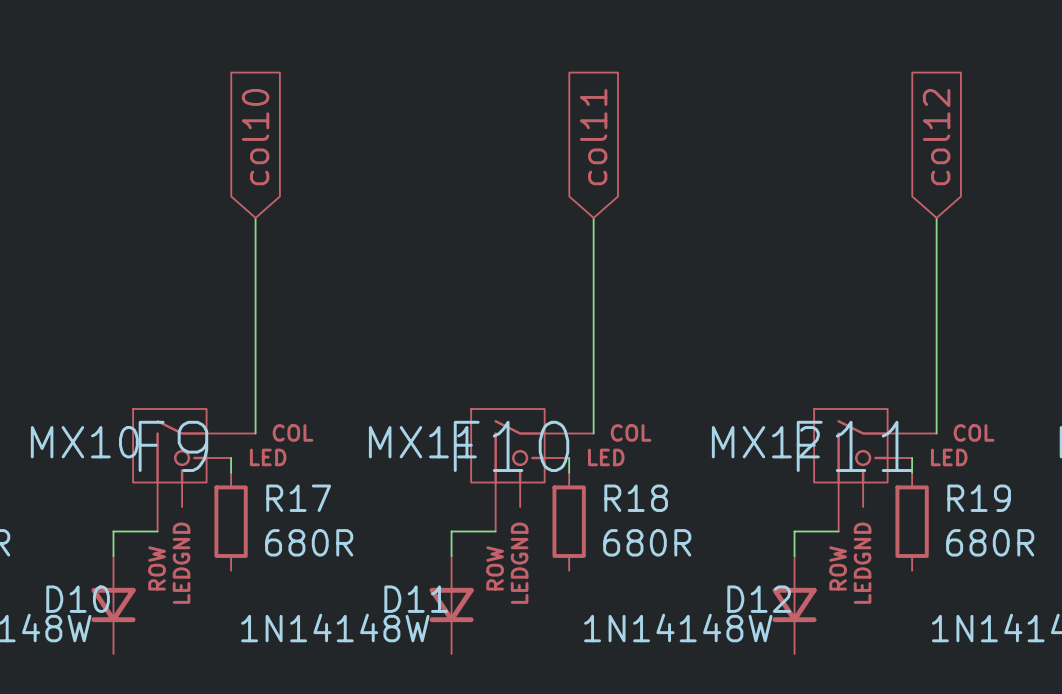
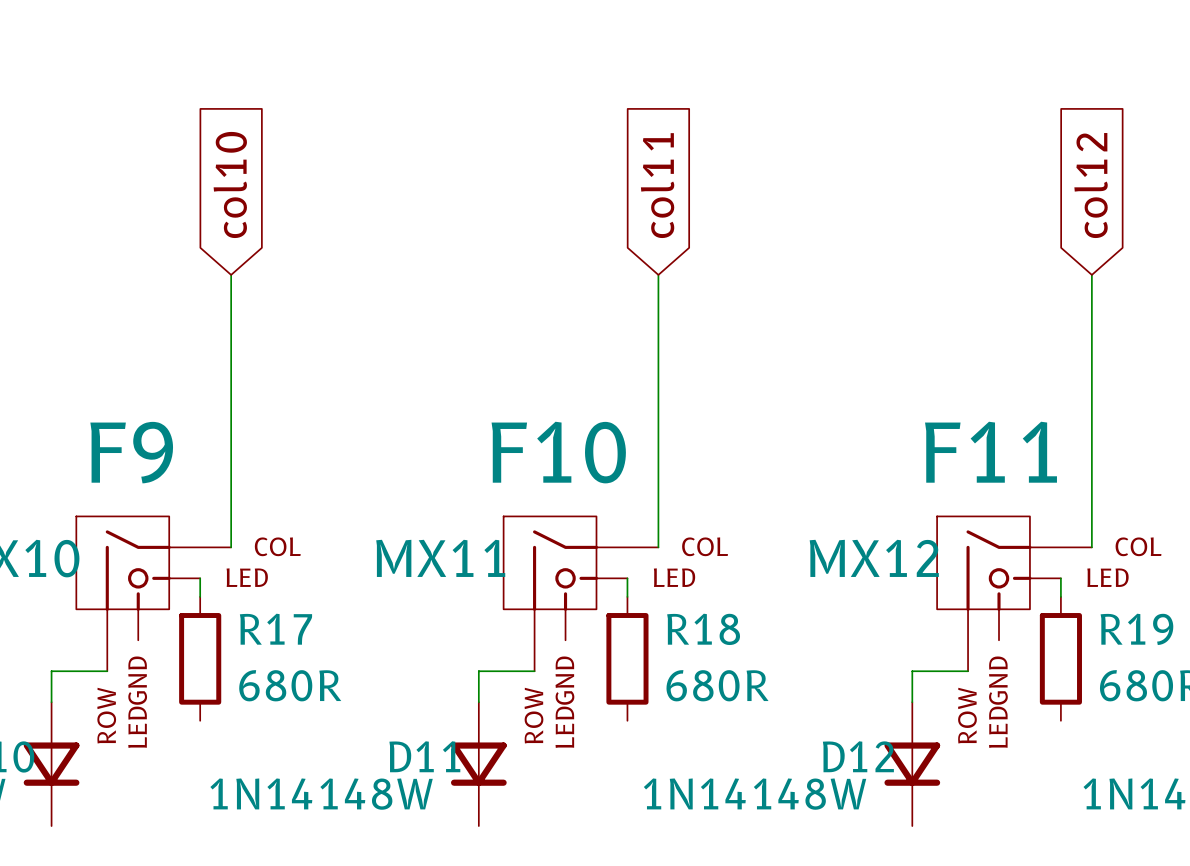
MX10 value position: F9 (173, 446) -> F9 (131, 452)
MX11 value position: F10 (511, 446) -> F10 (558, 452)
MX12 value position: F11 (854, 446) -> F11 (991, 452)

